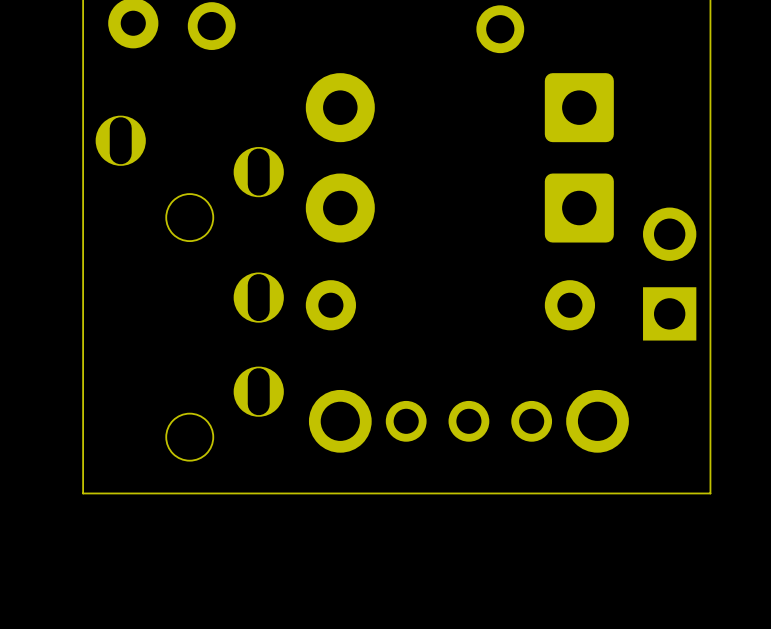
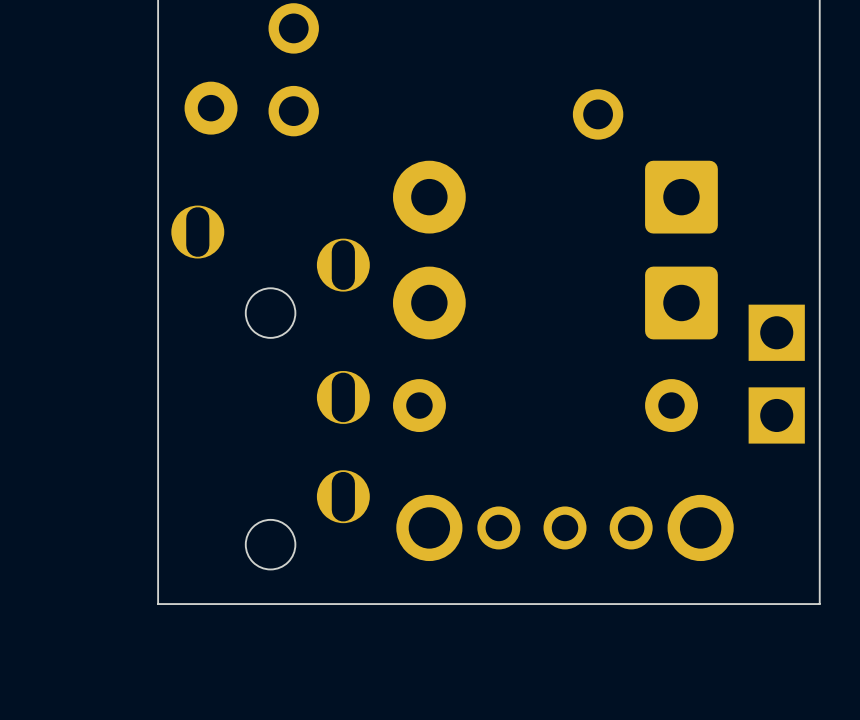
part: none -> (776, 332)
part: (669, 274) -> none
part: none -> (776, 415)

